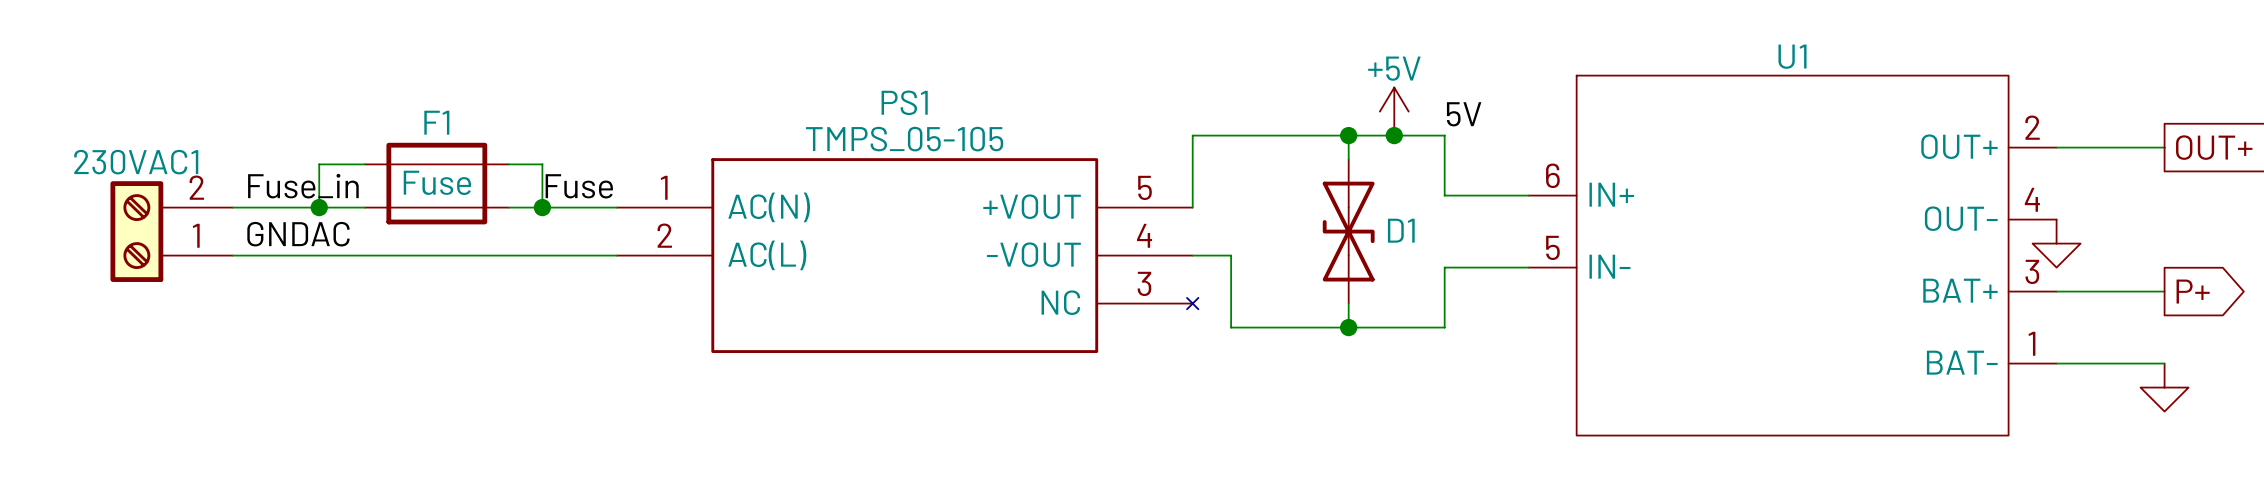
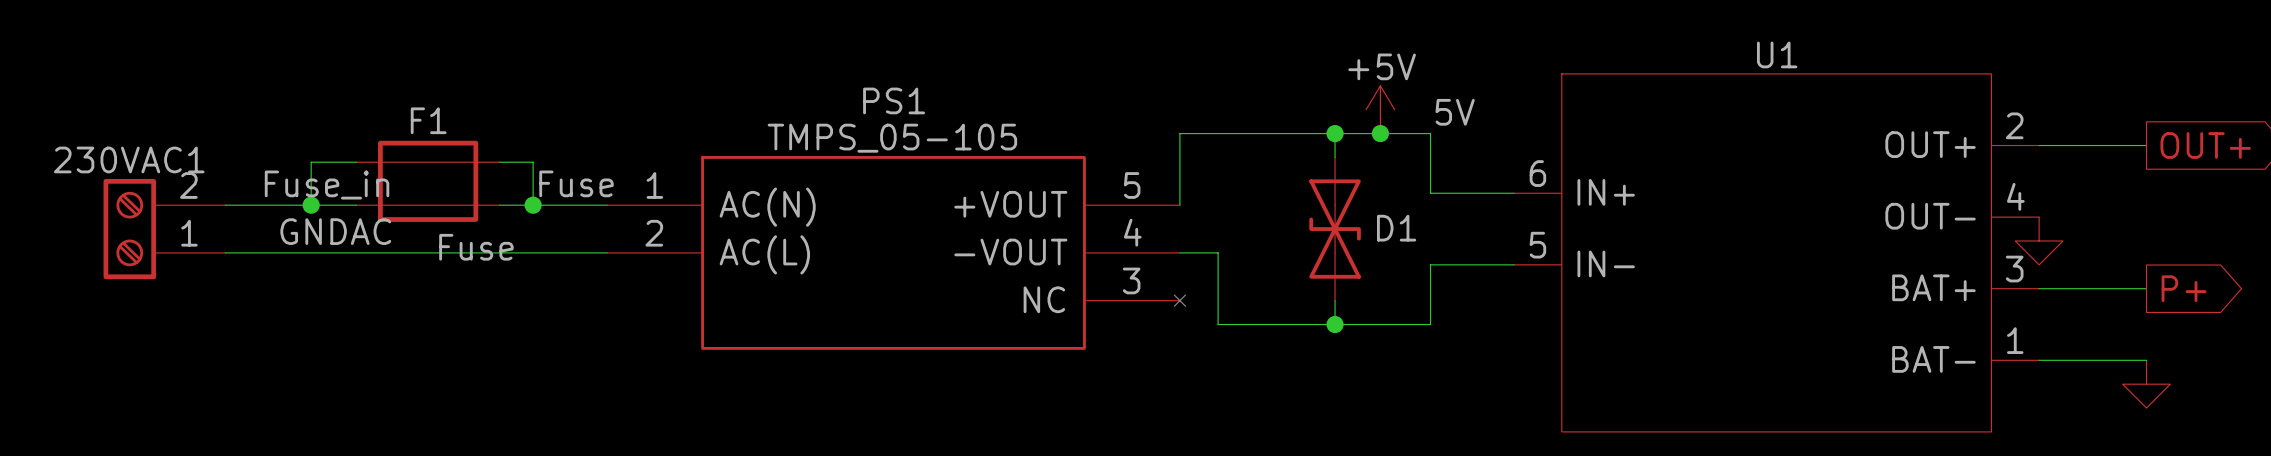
F1 value position: Fuse (437, 182) -> Fuse (476, 247)
label position: Fuse_in (303, 186) -> Fuse_in (327, 185)
label position: GNDAC (298, 234) -> GNDAC (335, 231)

